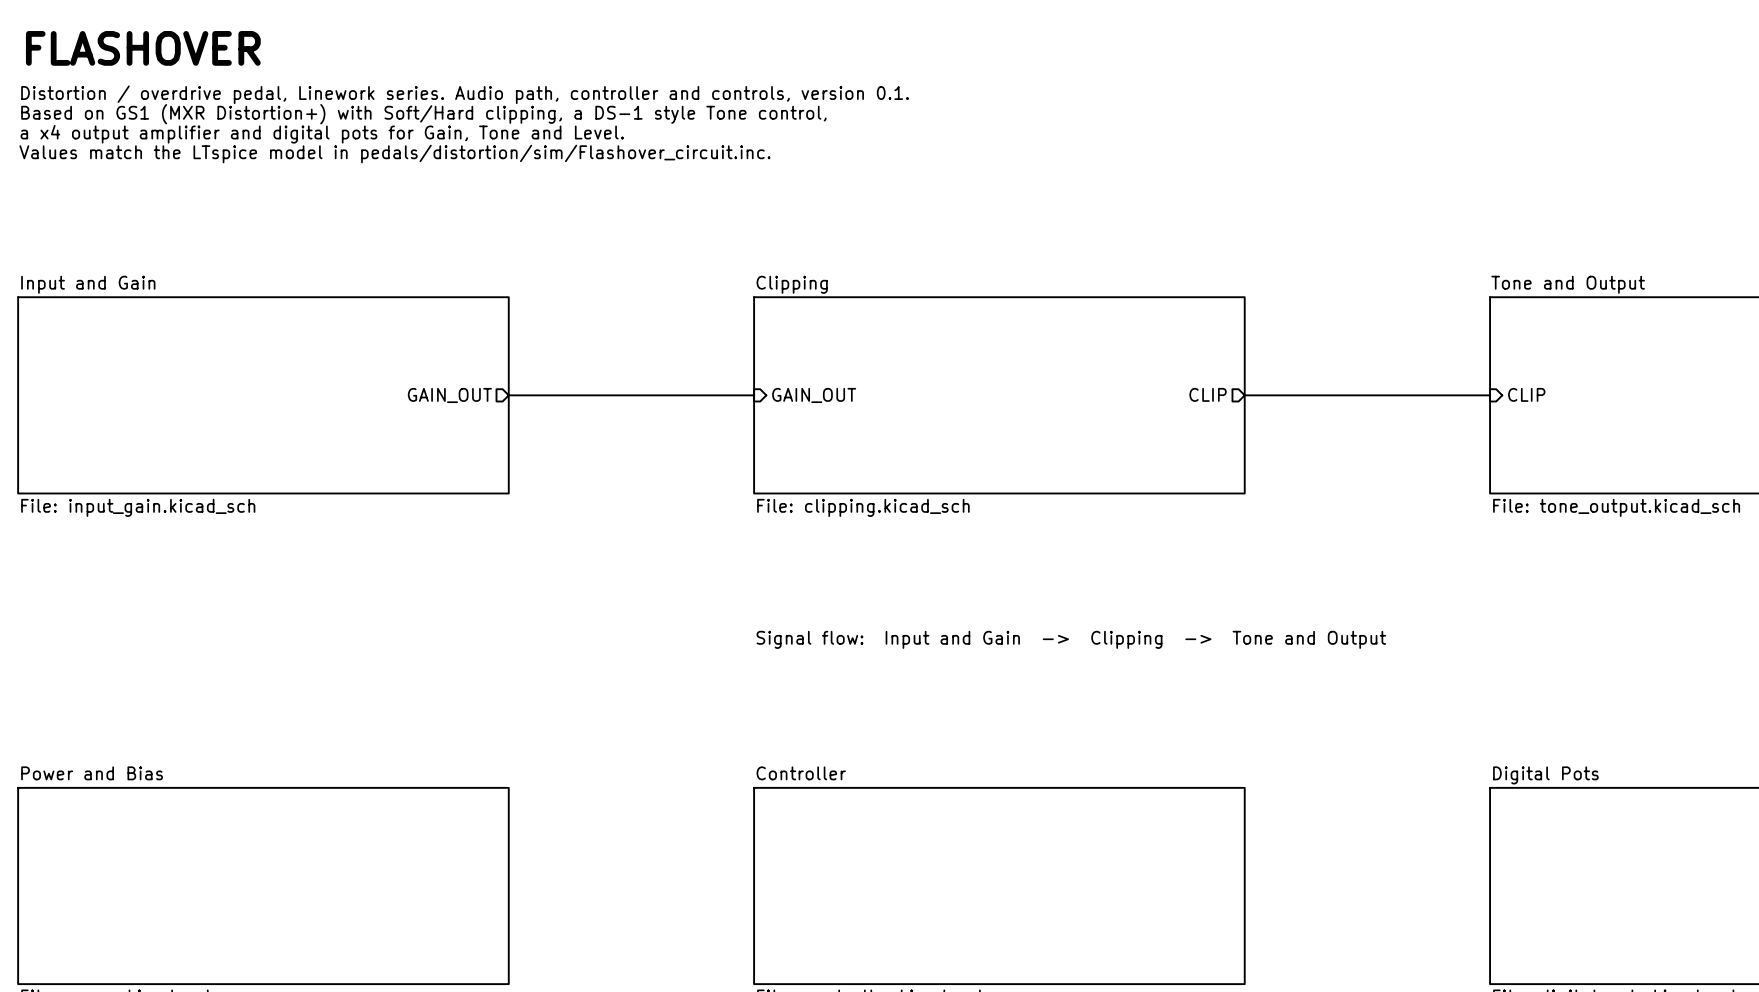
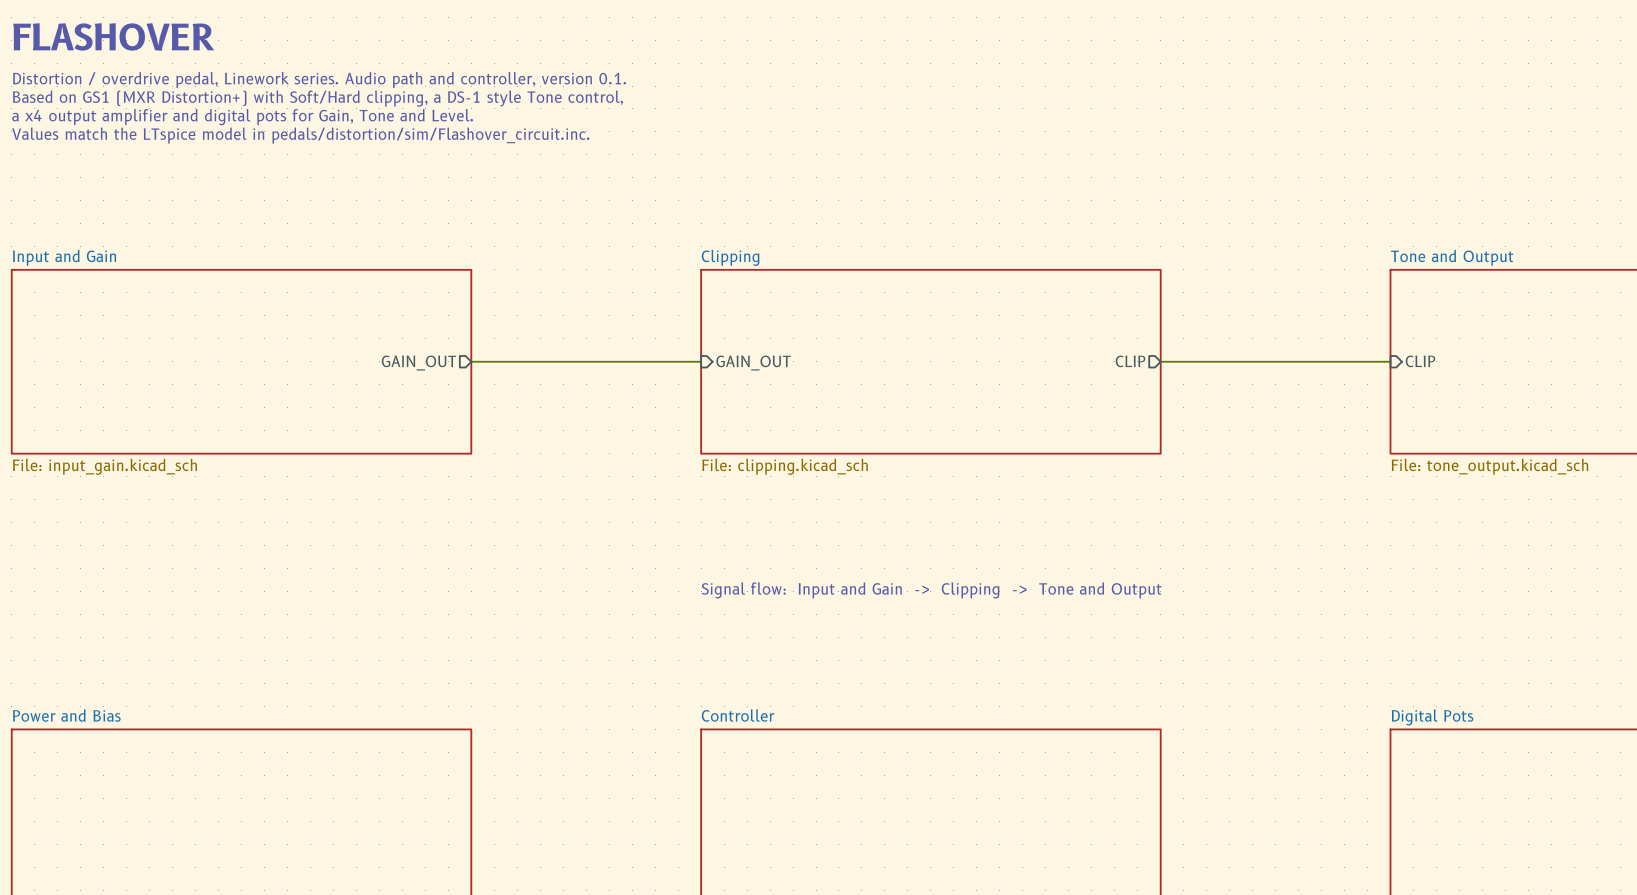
text: Distortion / overdrive pedal, Linework series. Audio path, controller and controls, version 0.1. (465, 94) -> Distortion / overdrive pedal, Linework series. Audio path and controller, version 0.1. (319, 80)

